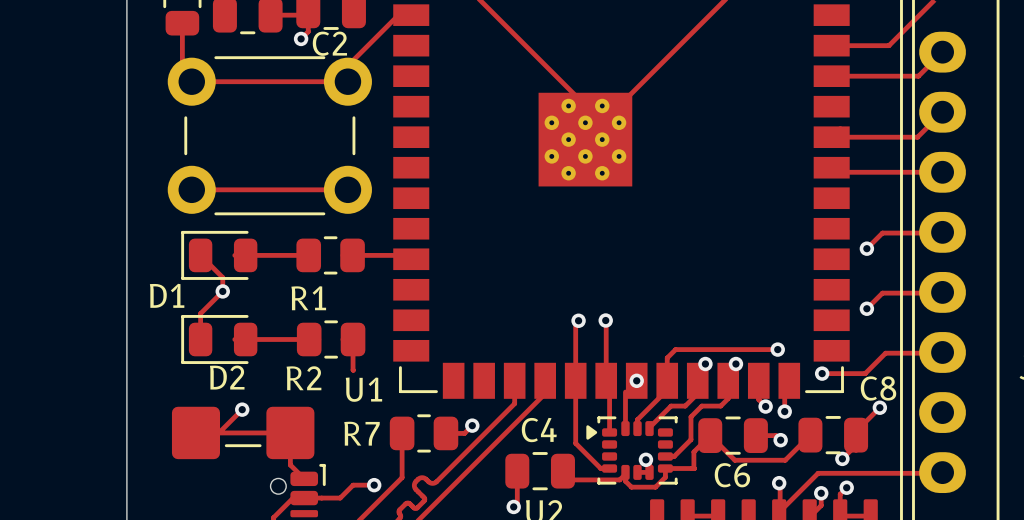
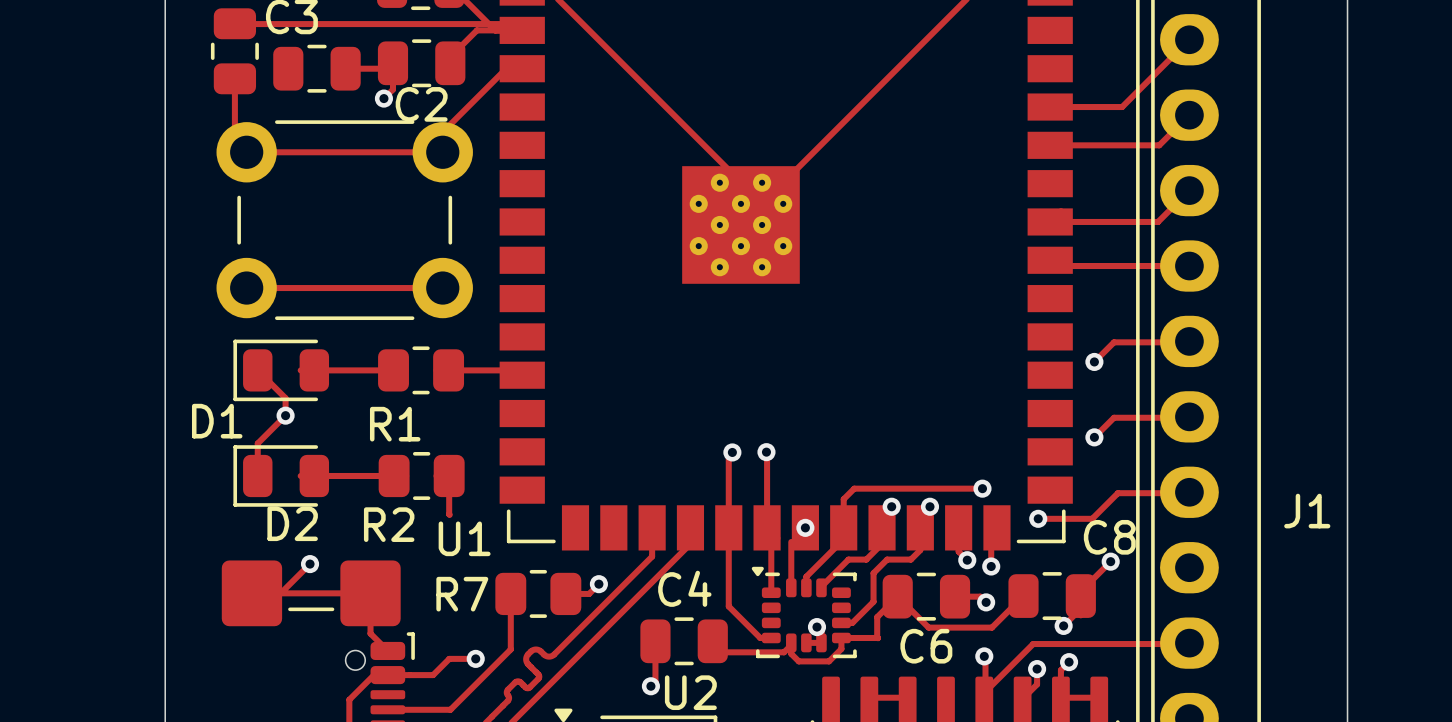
part footprint: [586, 416, 678, 485] -> [751, 566, 857, 659]

